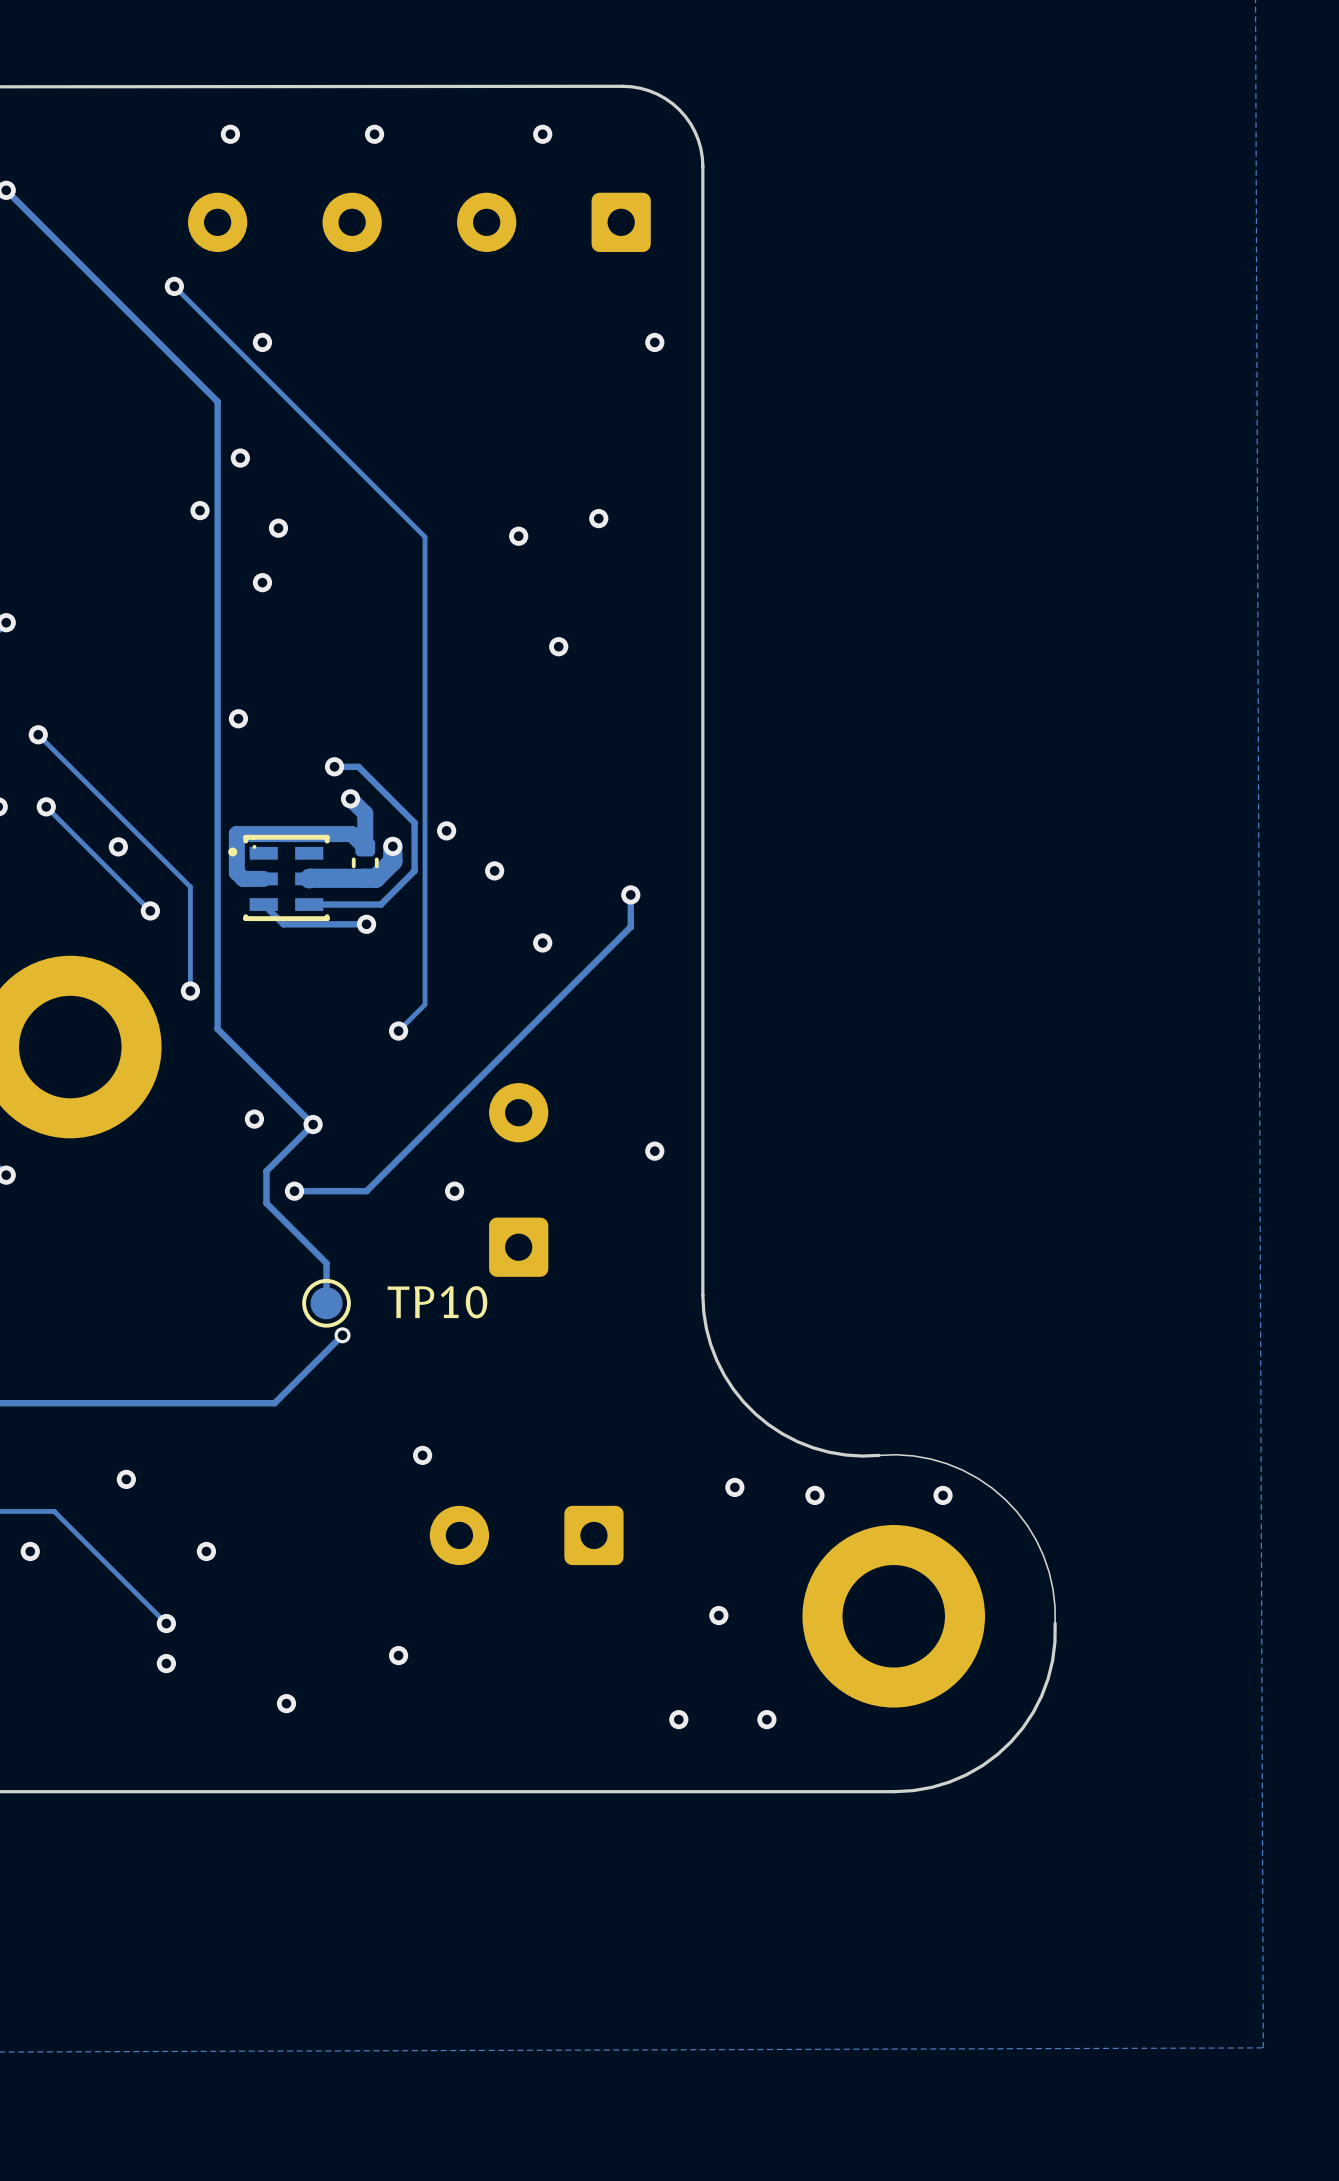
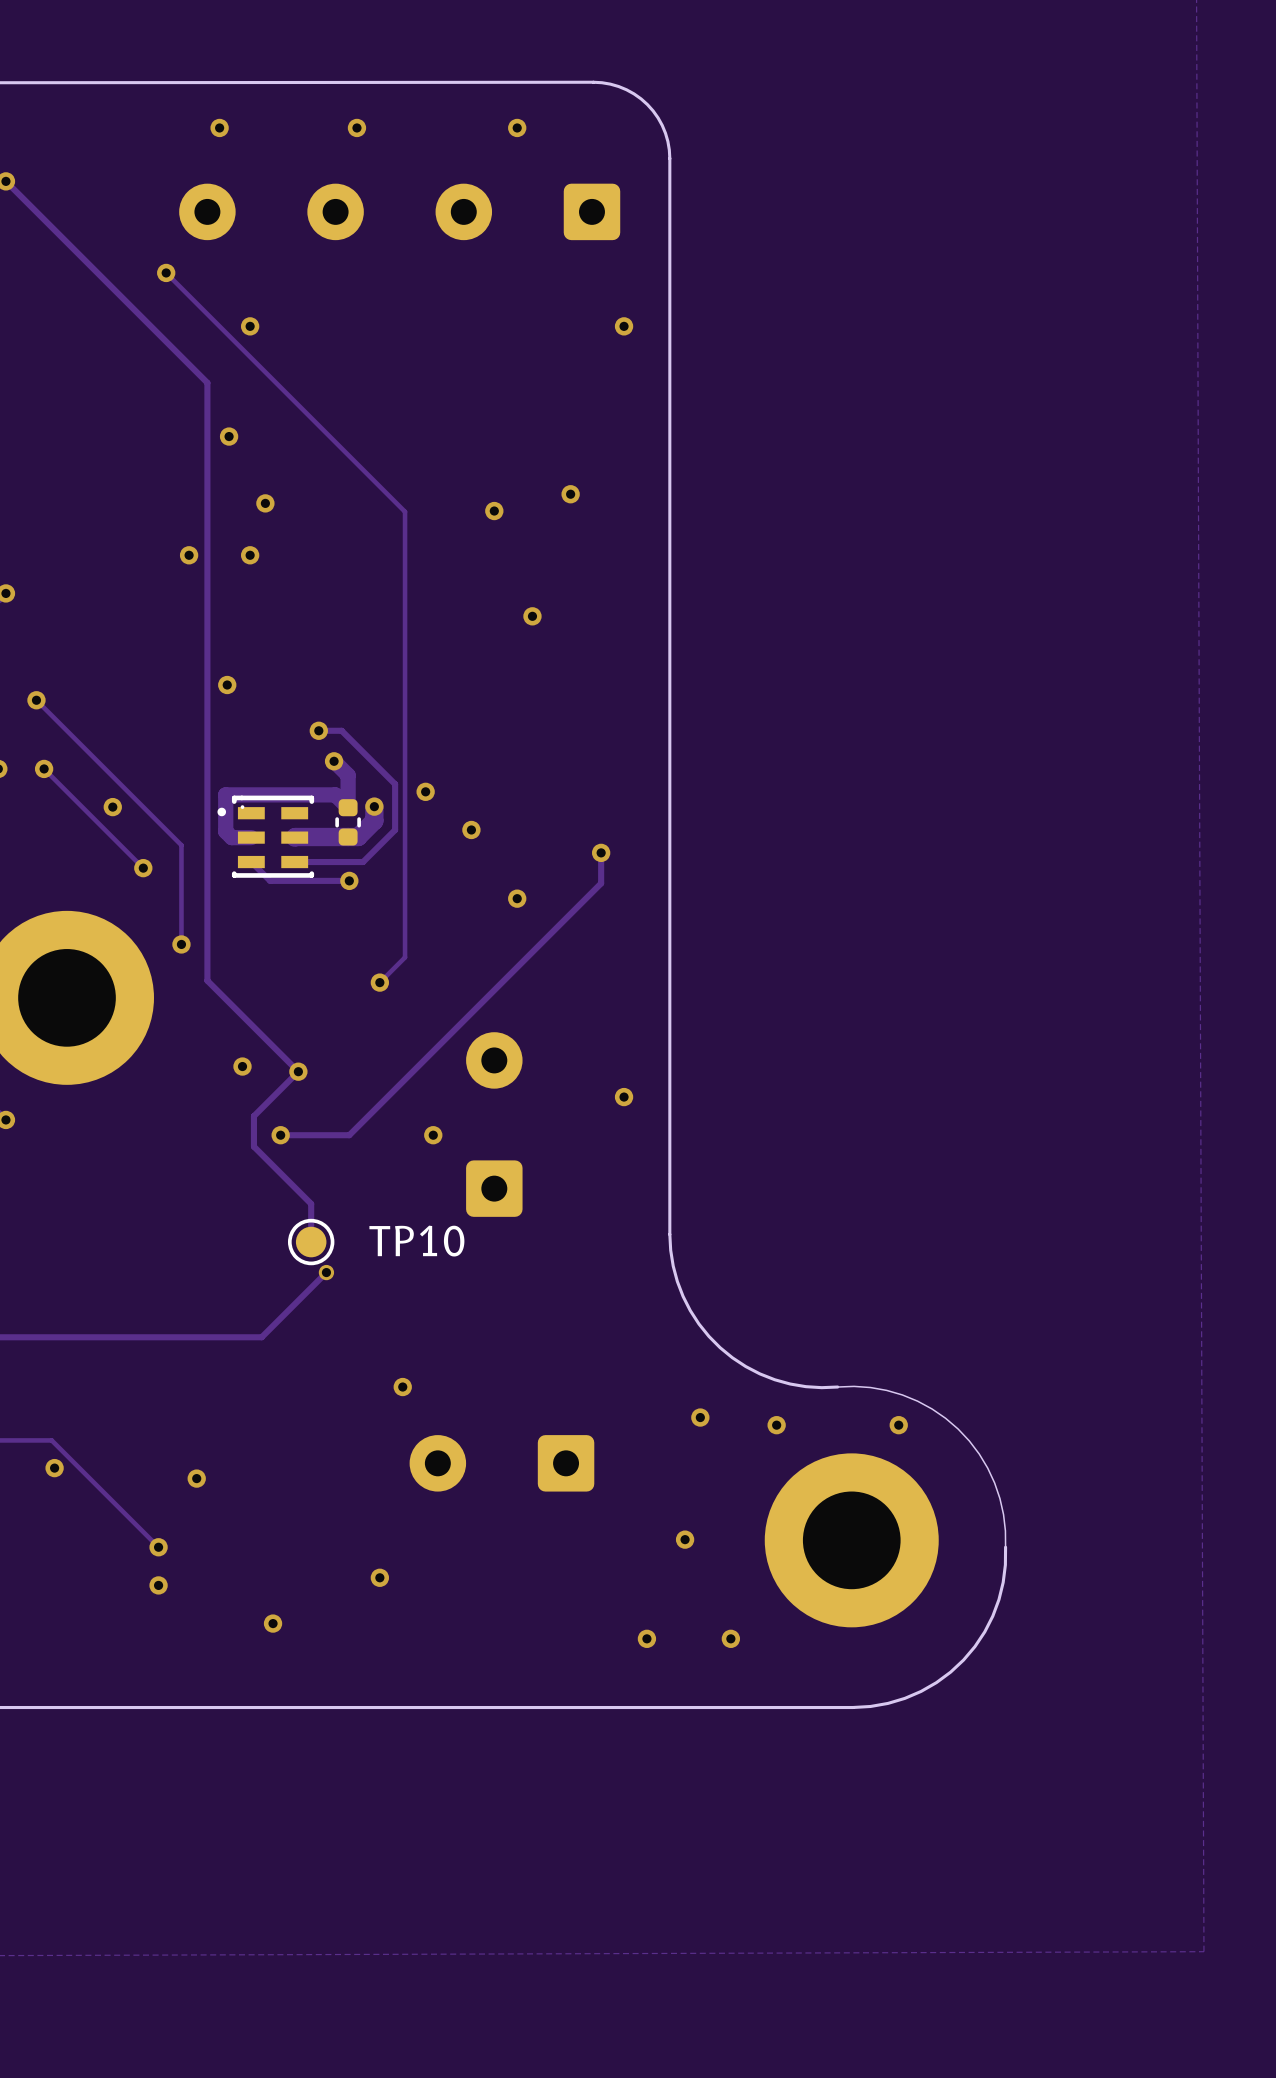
via position: (200, 510) -> (189, 555)
via: (126, 1479) -> none
via: none -> (54, 1468)
via: (30, 1551) -> none

